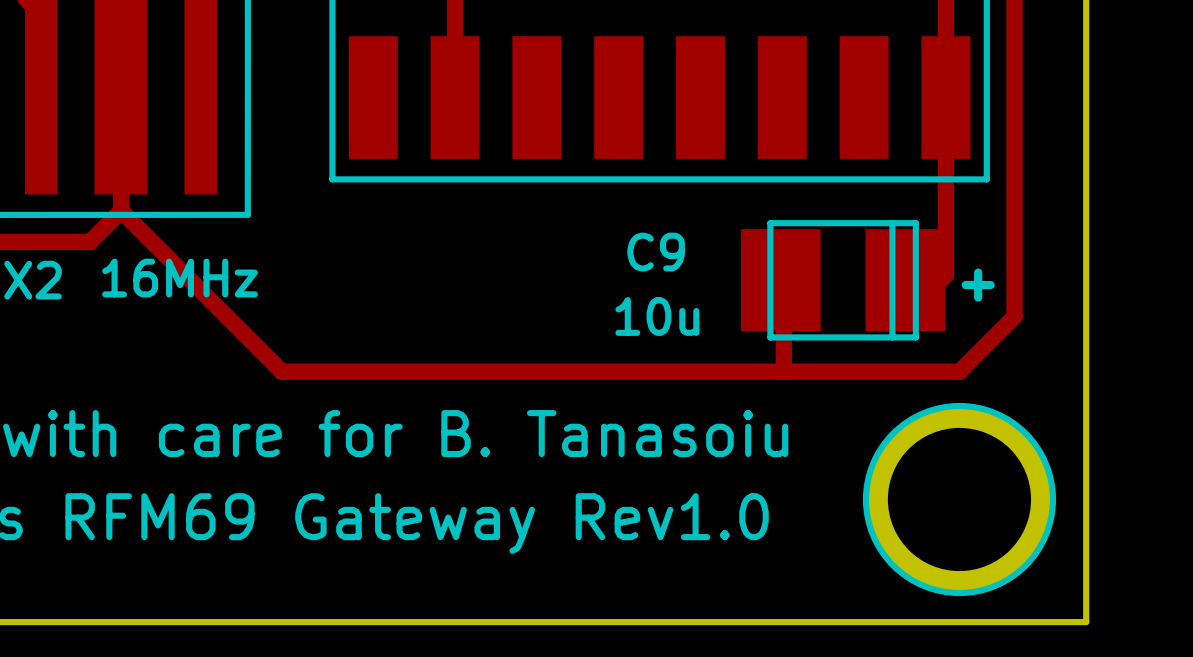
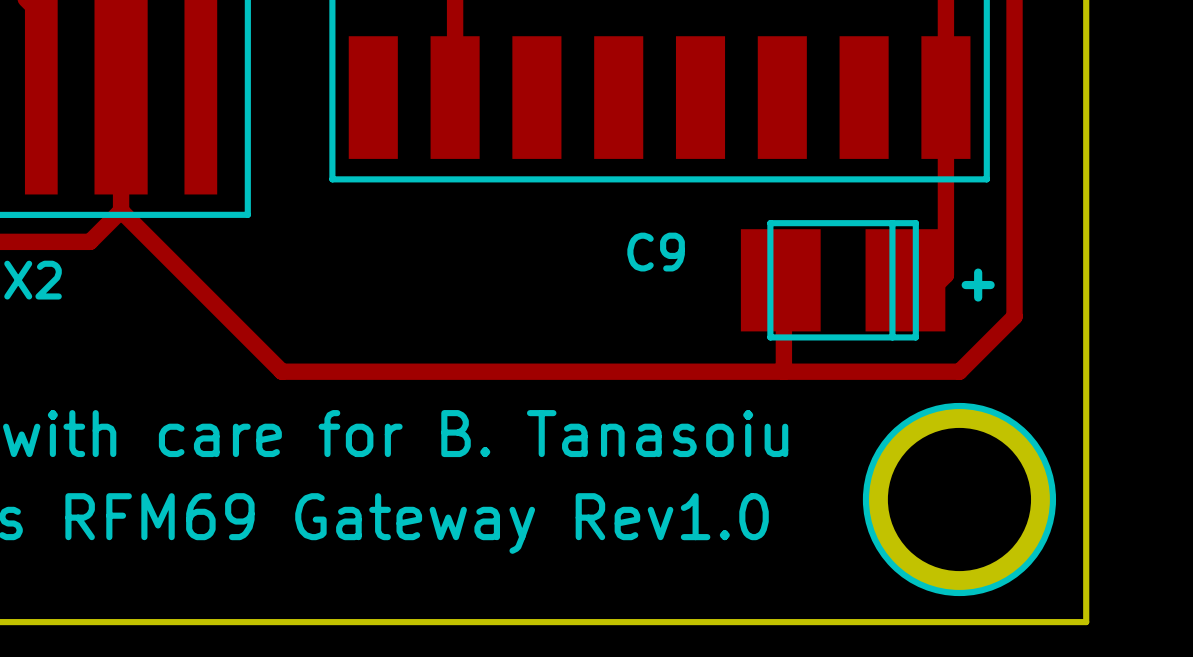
X2 value: 16MHz (180, 278) -> none
C9 value: 10u (657, 316) -> none

